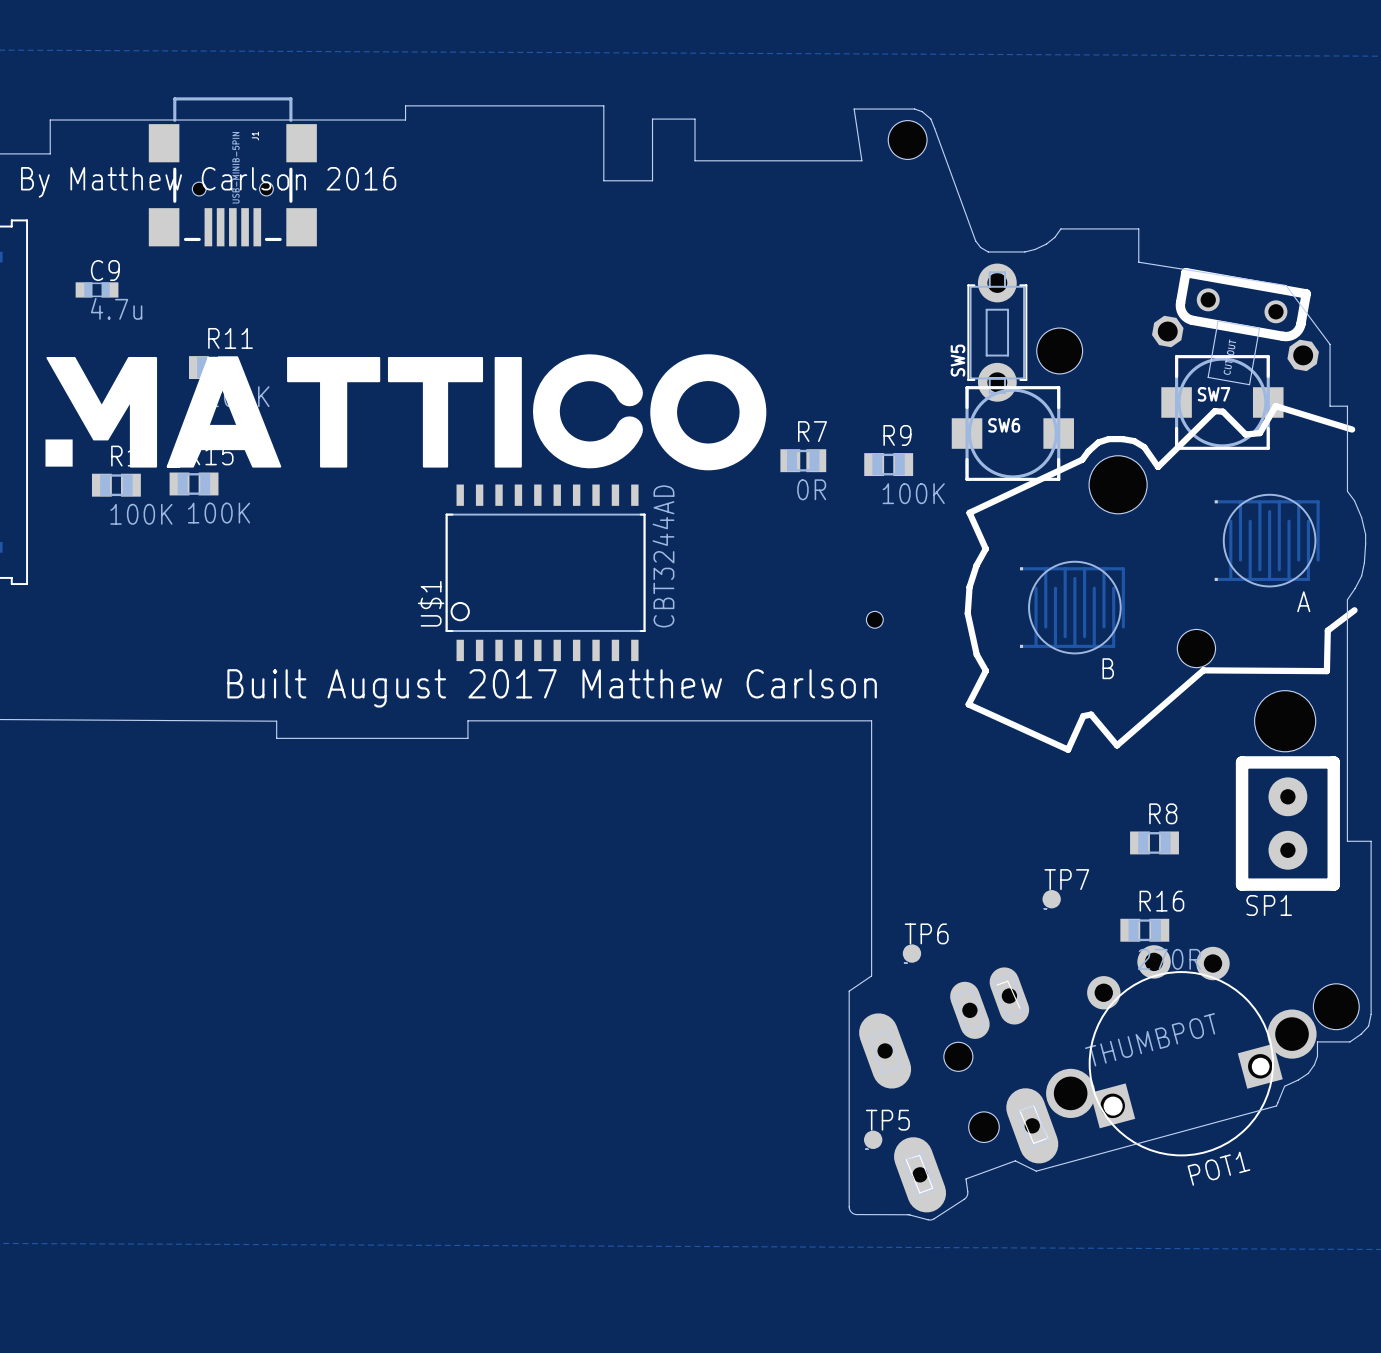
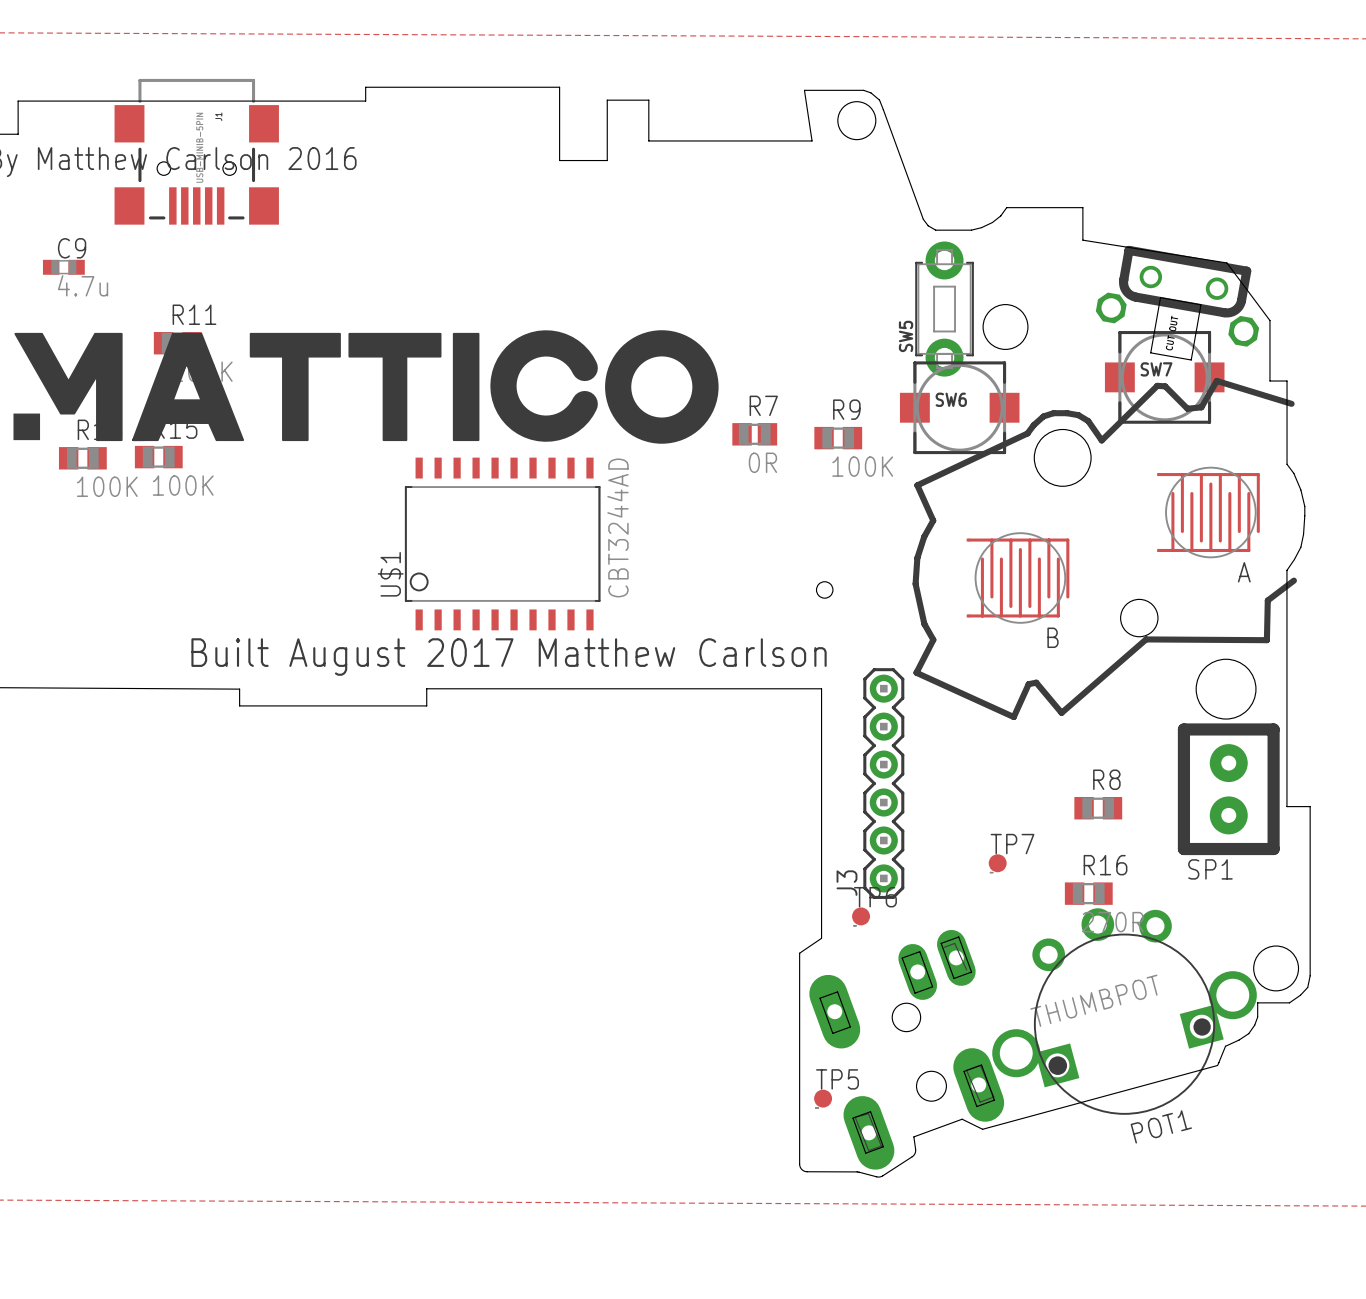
J3: none -> (883, 783)

